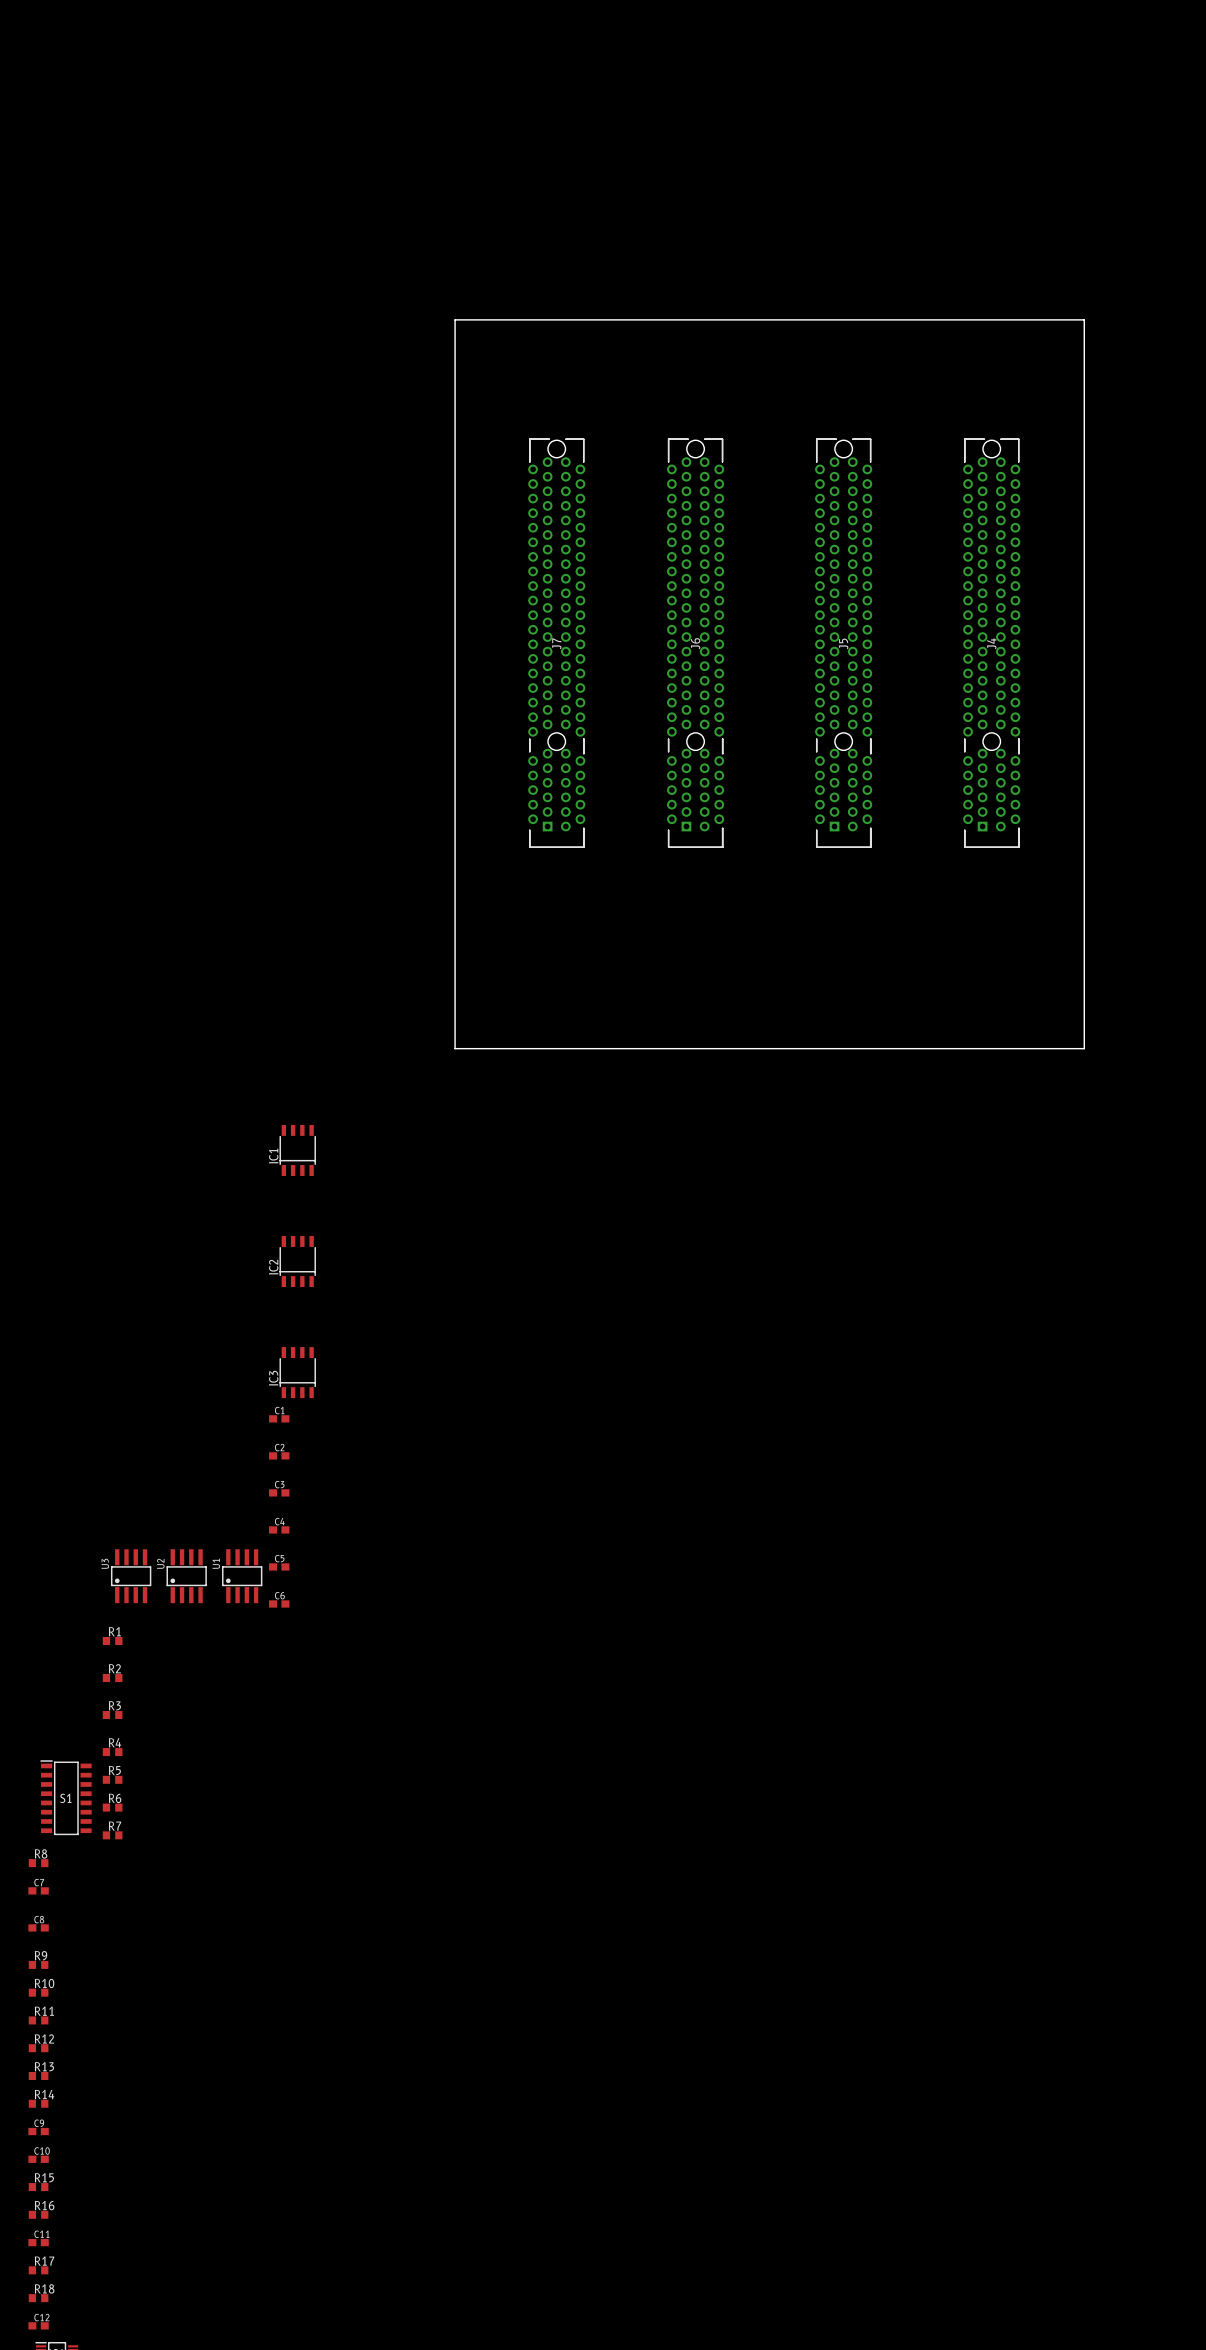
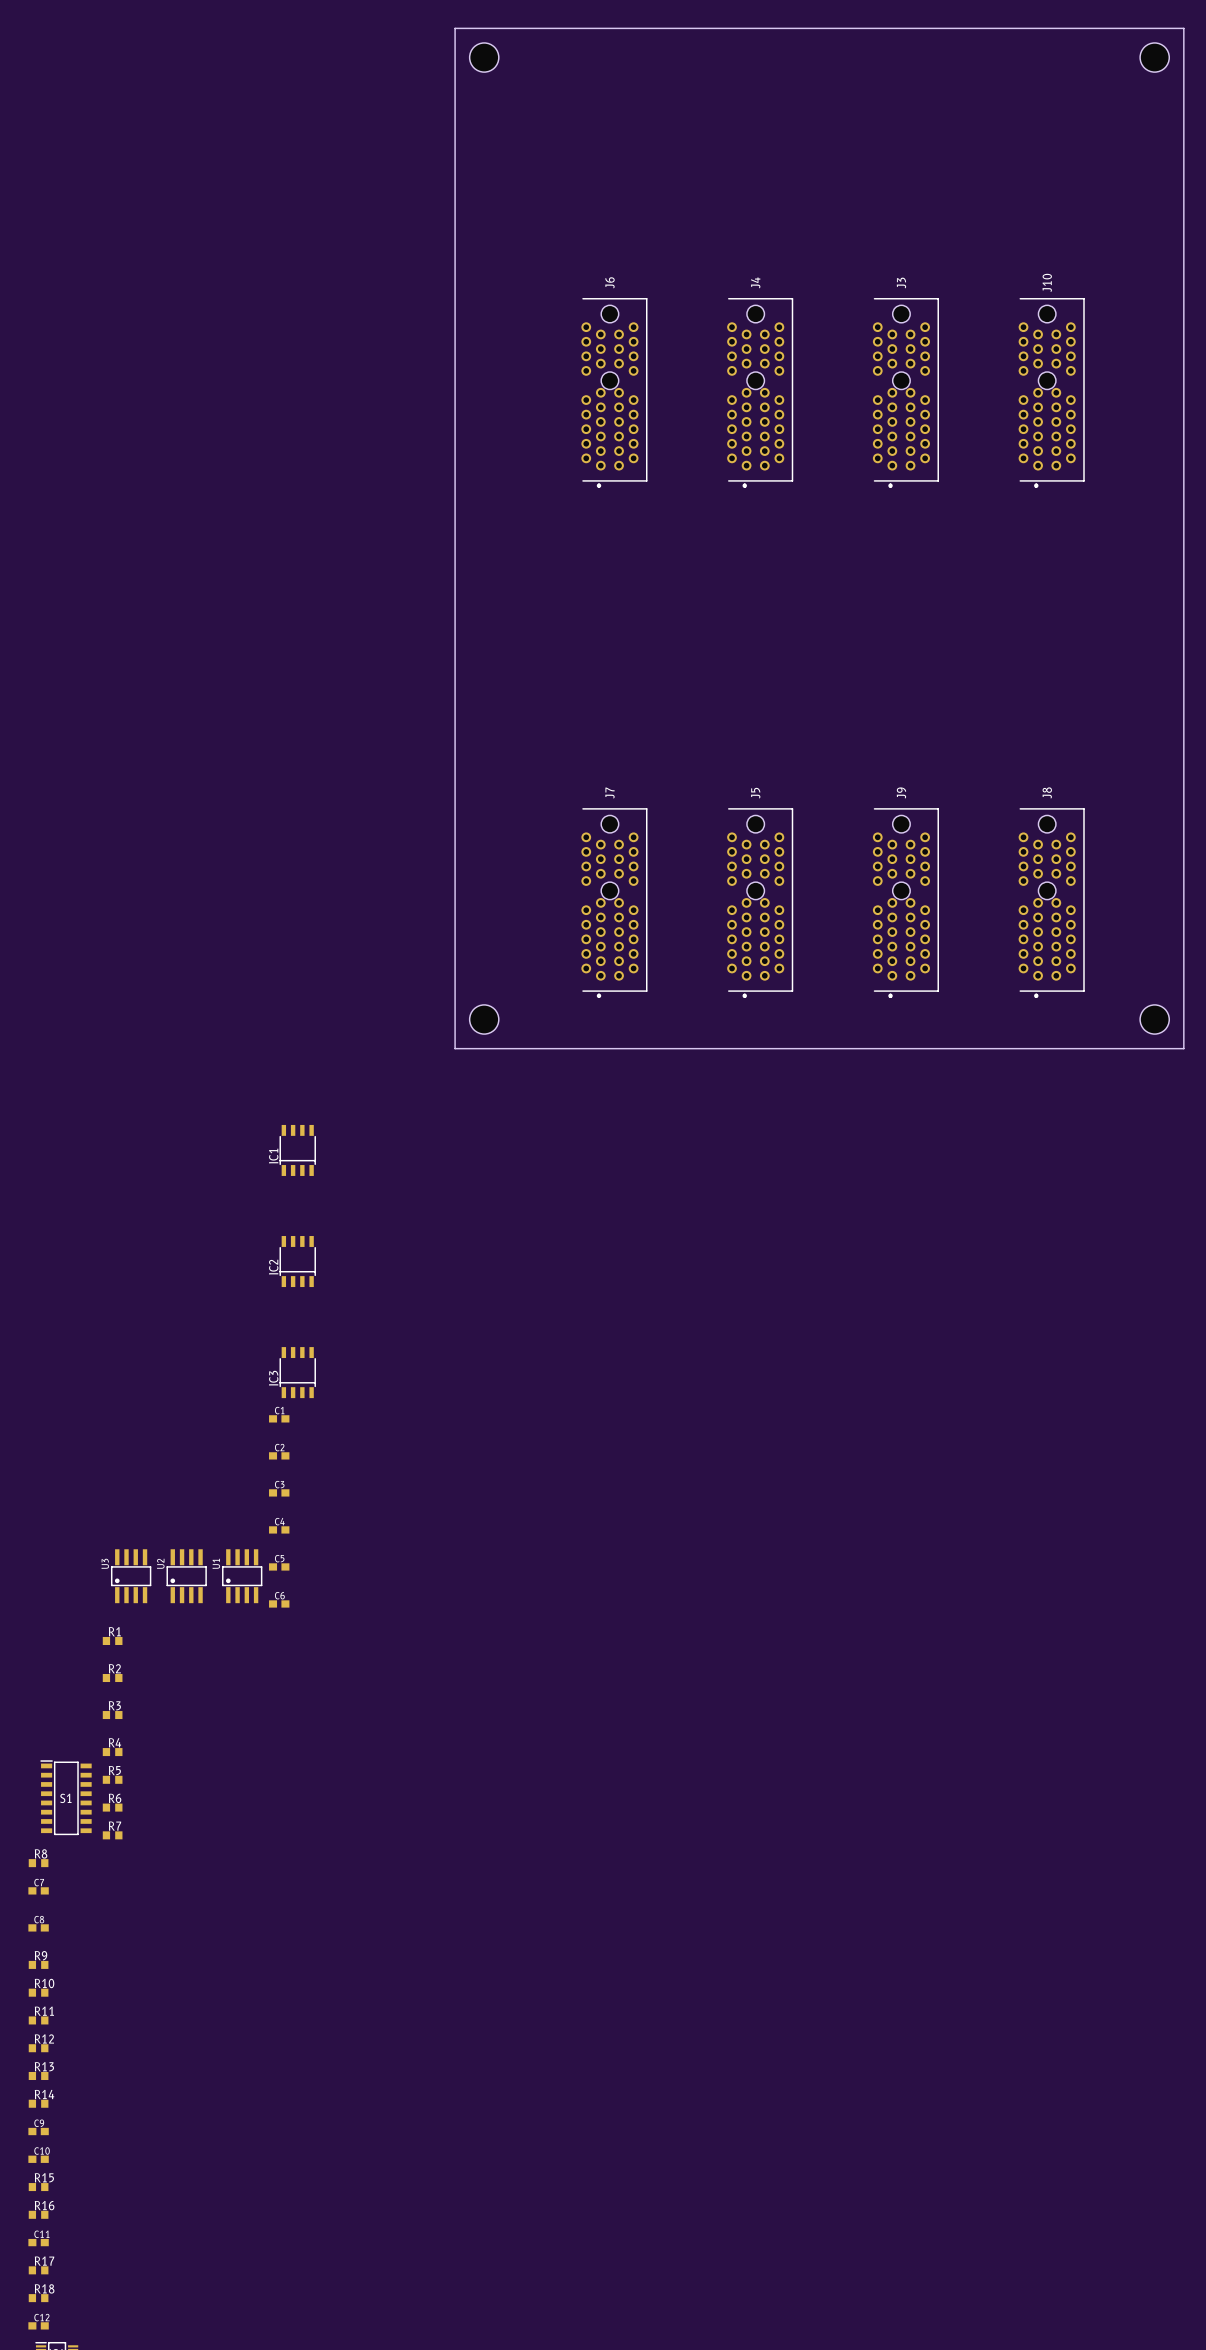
hole: none -> (484, 57)
hole: none -> (1154, 57)
board edge: (455, 319) (1084, 319) (1084, 1048) -> (455, 319) (455, 28) (1183, 28) (1183, 1048) (1084, 1048)
J3: none -> (905, 393)
J10: none -> (1051, 393)
J7 footprint: [528, 438, 586, 848] -> [581, 808, 648, 999]
J6 footprint: [667, 438, 725, 848] -> [581, 298, 648, 488]
J5 footprint: [815, 438, 873, 848] -> [727, 808, 793, 999]
J4 footprint: [963, 438, 1021, 848] -> [727, 298, 793, 488]
J7 name position: J7 (556, 643) -> J7 (609, 793)
J6 name position: J6 (695, 643) -> J6 (609, 282)
J5 name position: J5 (843, 643) -> J5 (755, 793)
J4 name position: J4 (991, 643) -> J4 (755, 282)
J9: none -> (905, 903)
J8: none -> (1051, 903)
hole: none -> (484, 1019)
hole: none -> (1154, 1019)

